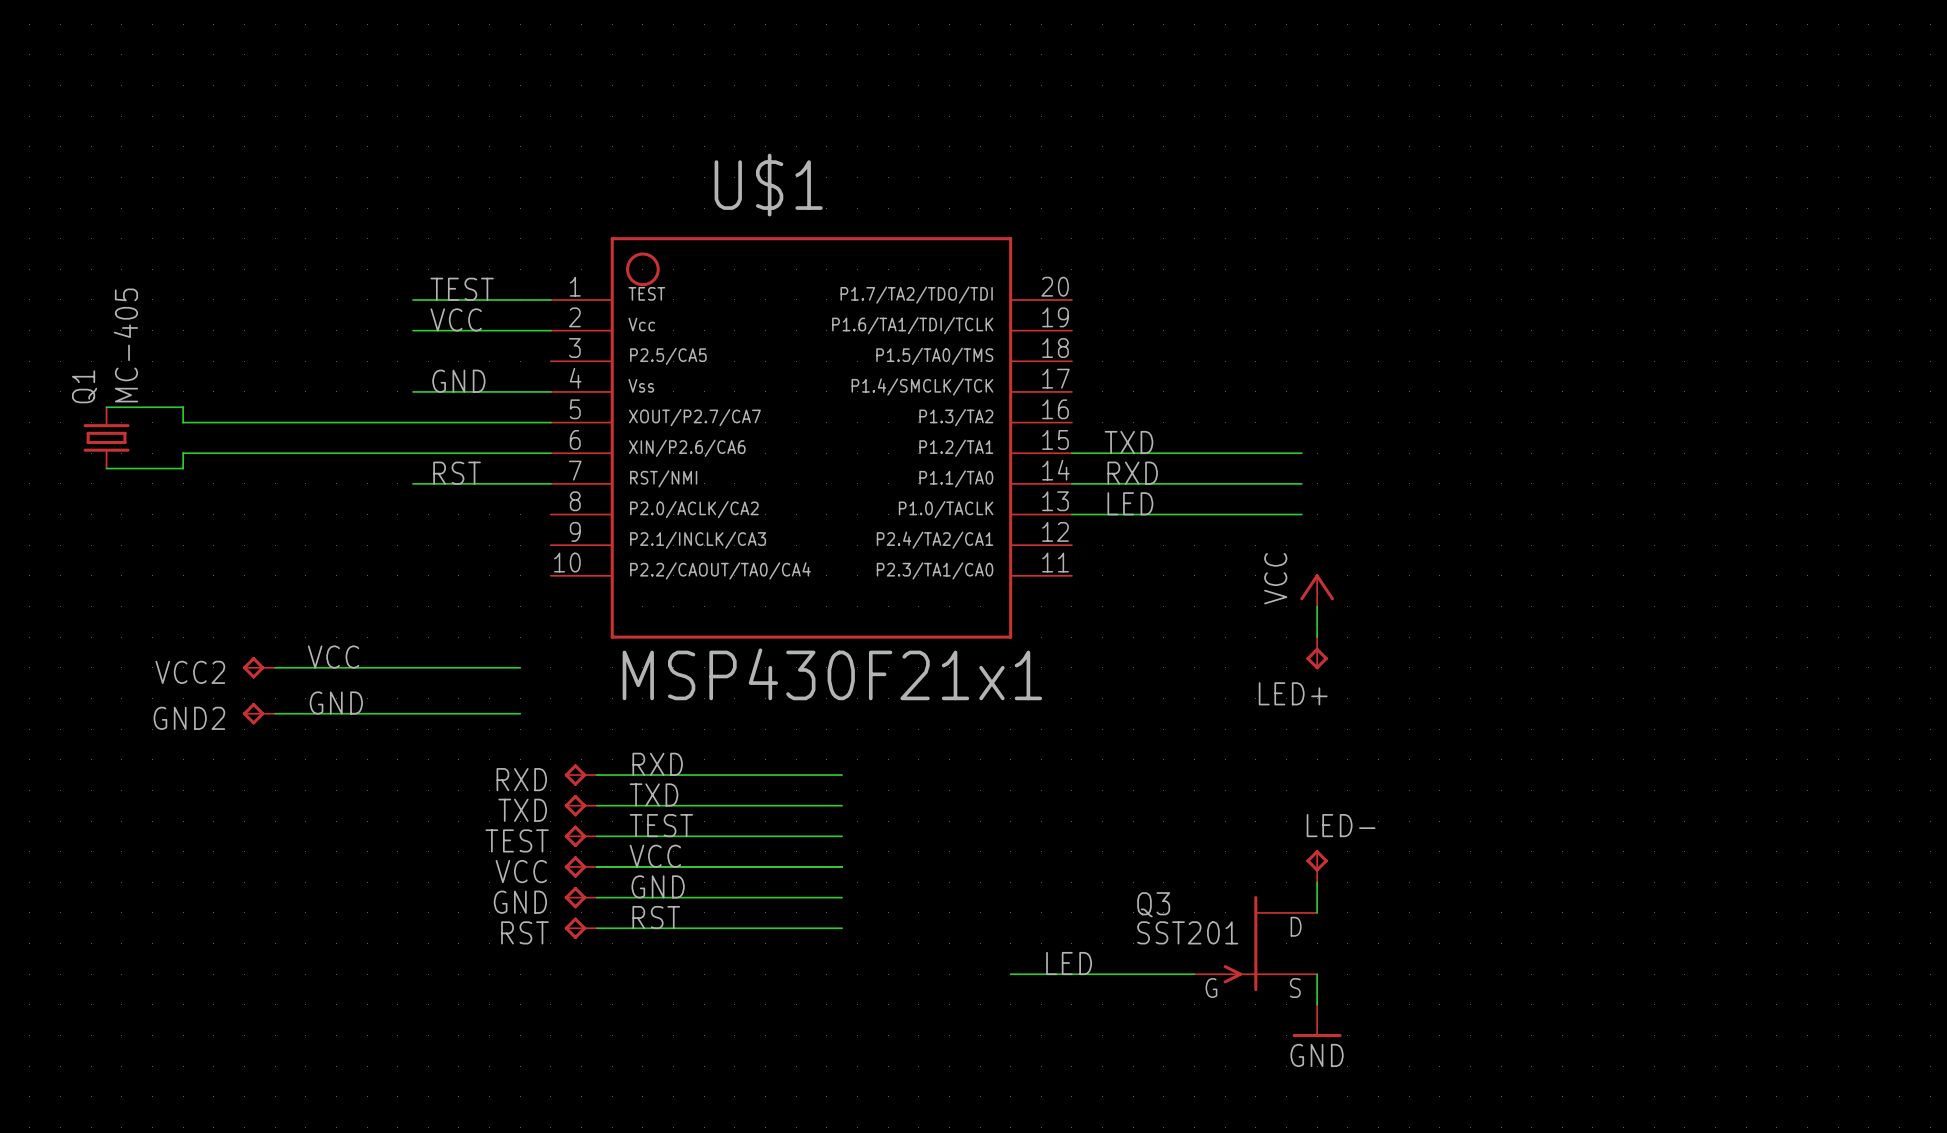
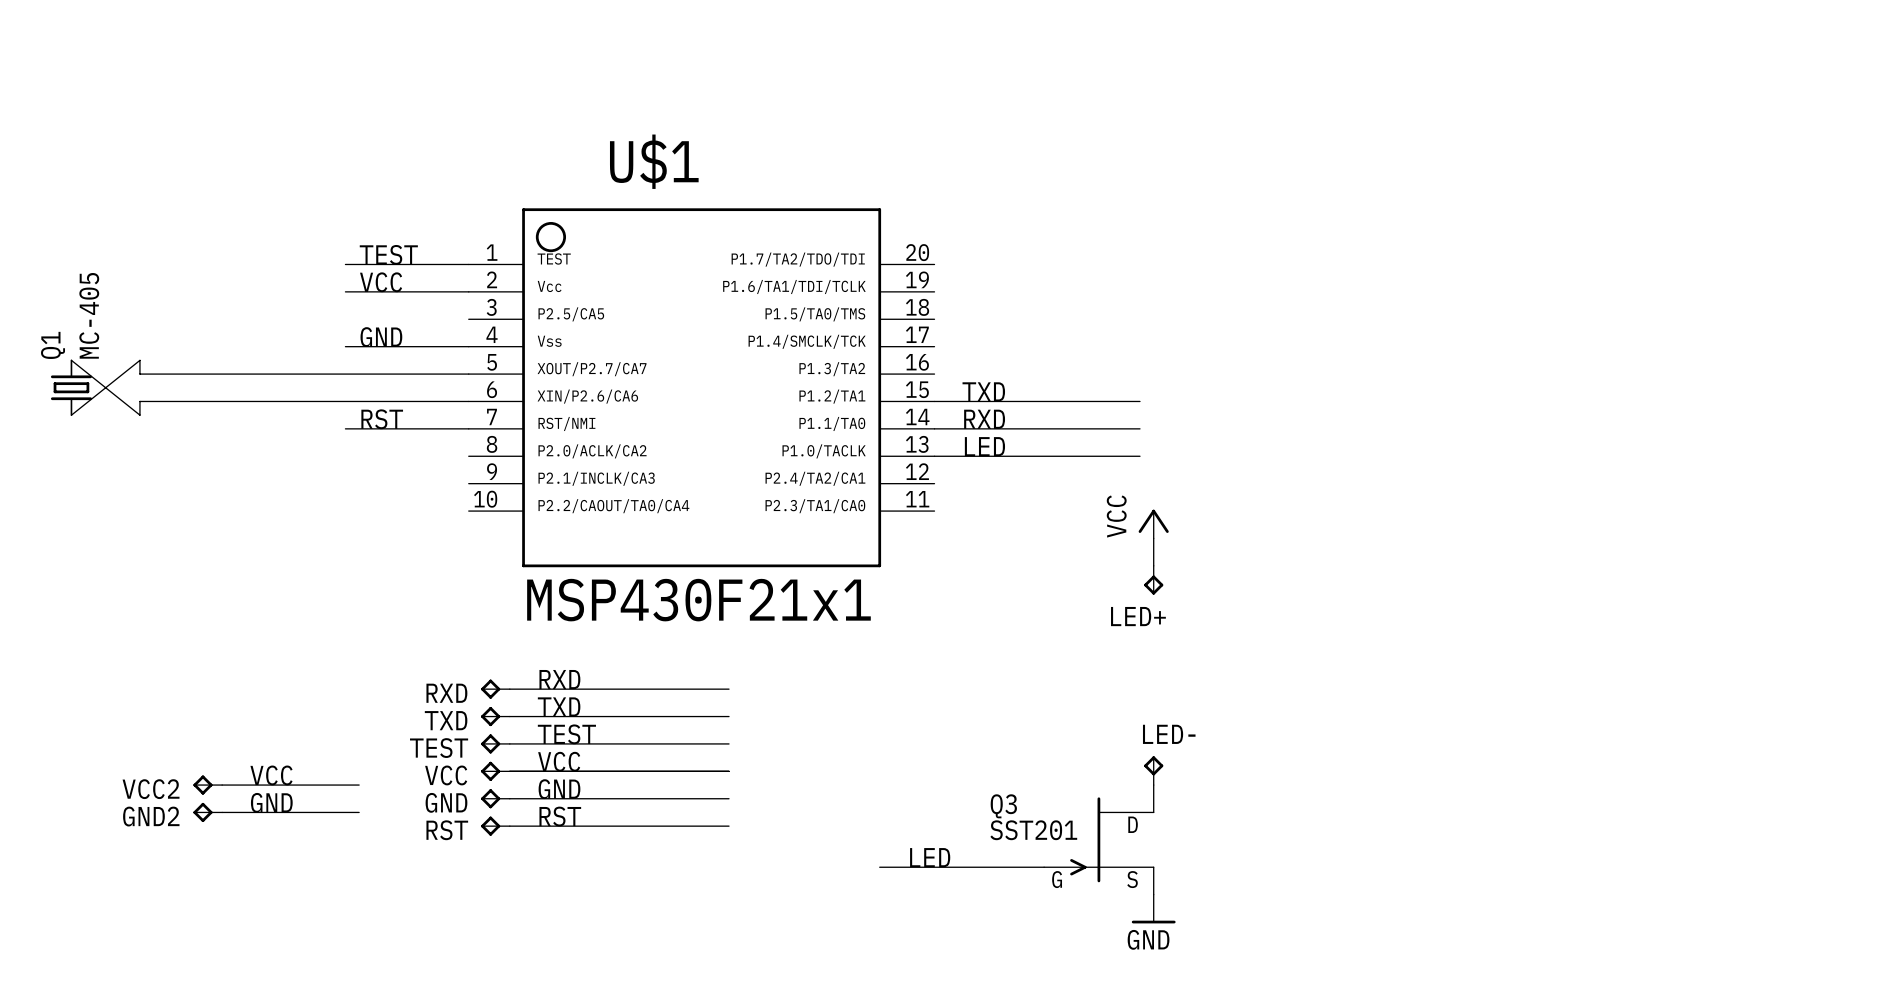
wire: (106, 407) (183, 407) -> (71, 360) (139, 415)
wire: (106, 468) (183, 468) -> (71, 415) (139, 360)
label position: VCC (333, 657) -> VCC (271, 775)
VCC2 position: (259, 667) -> (207, 785)
wire: (275, 667) (520, 667) -> none
label position: GND (336, 703) -> GND (271, 802)
GND2 position: (259, 713) -> (207, 812)
wire: (275, 713) (520, 713) -> none
wire: none -> (222, 785) (359, 785)
wire: none -> (222, 812) (359, 812)

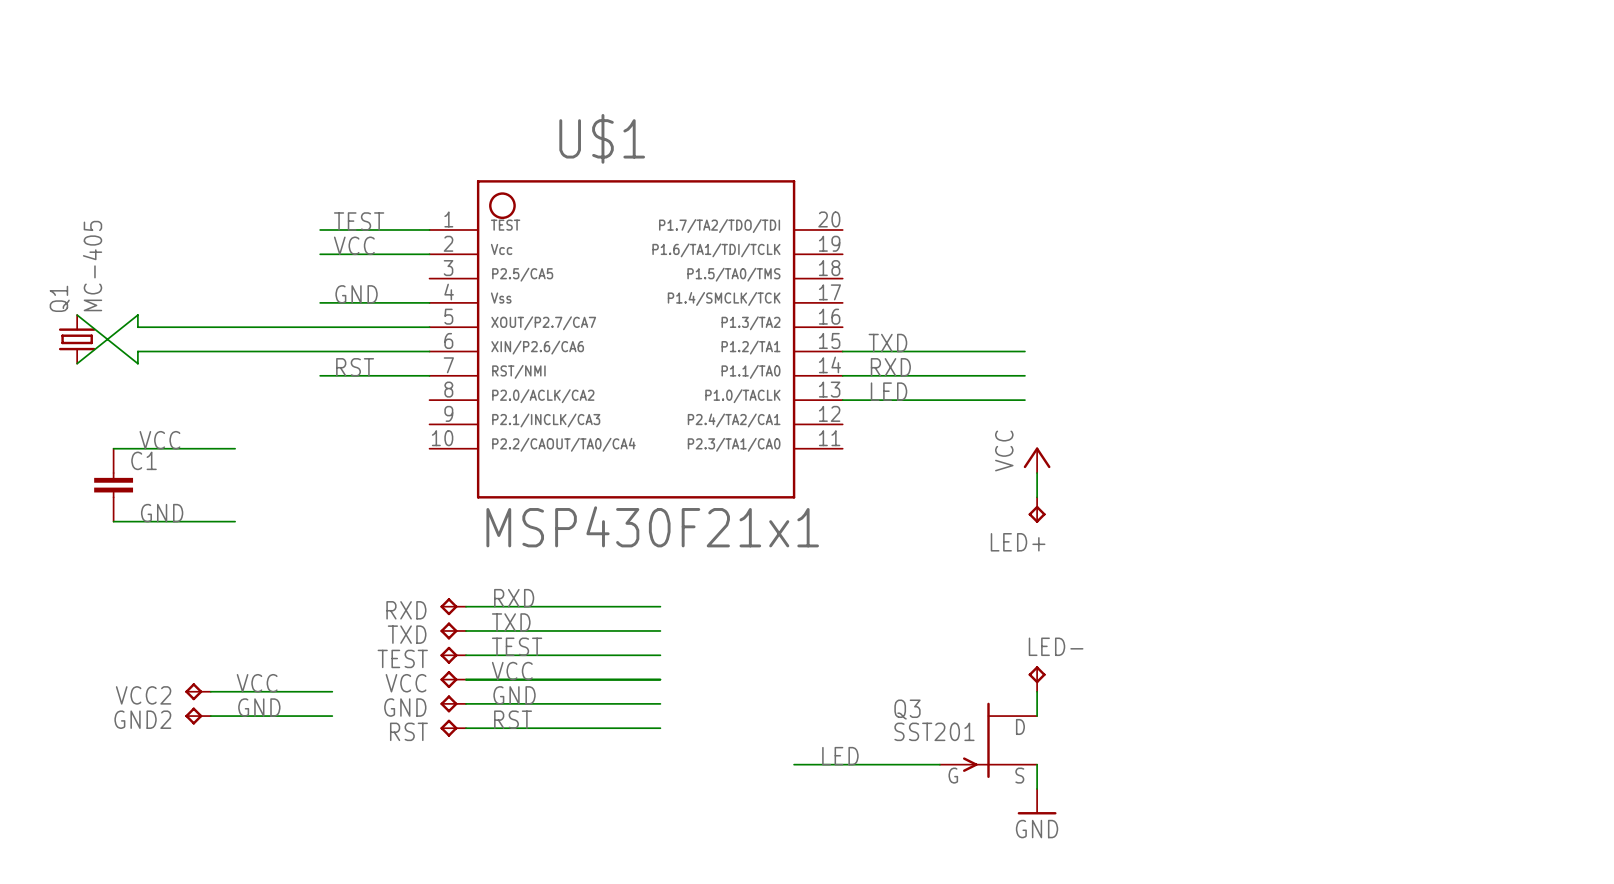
label: none -> VCC (159, 440)
wire: none -> (113, 448) (235, 448)
C1: none -> (113, 485)
label: none -> GND (162, 513)
wire: none -> (113, 521) (235, 521)

